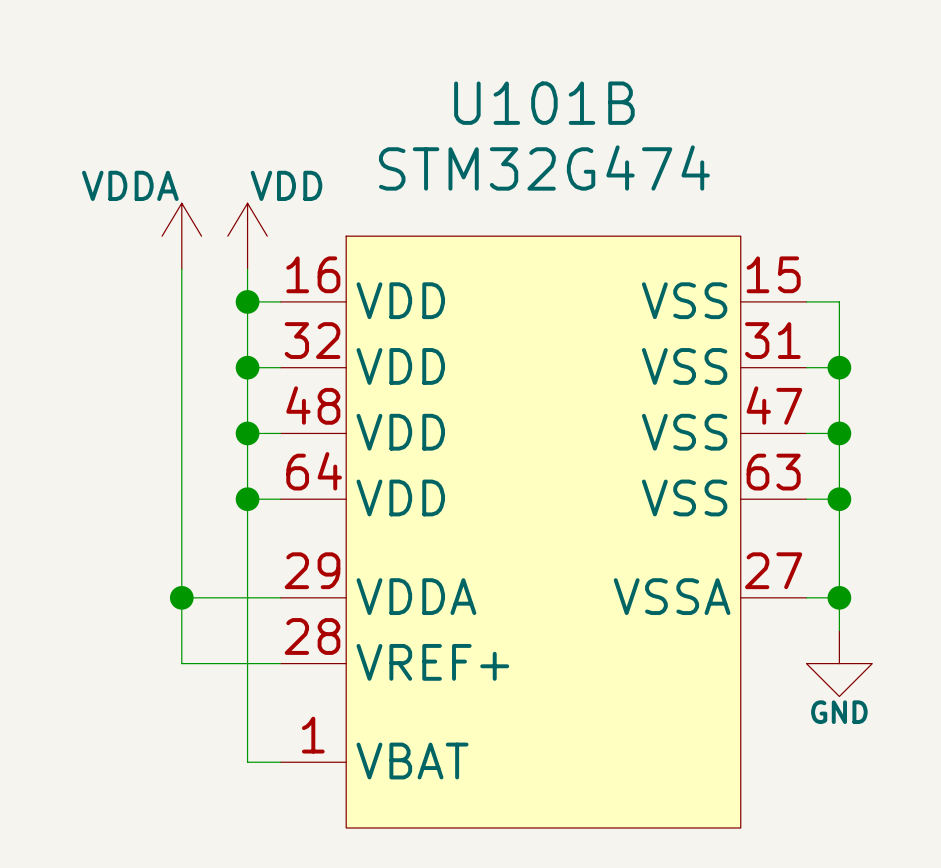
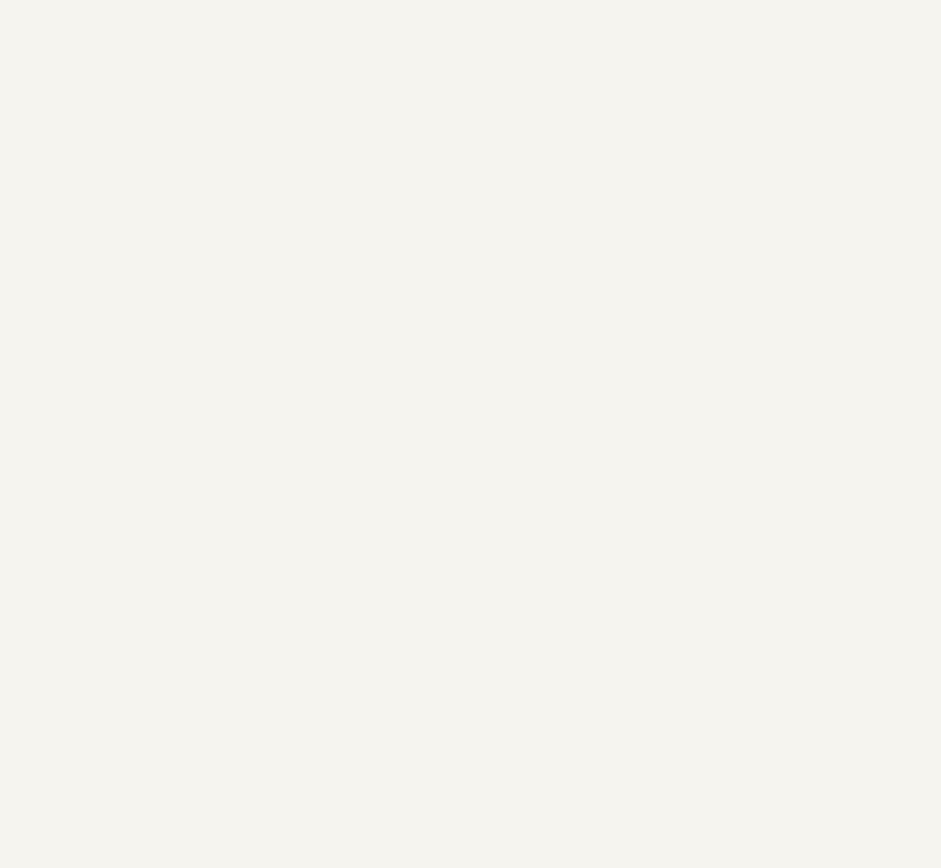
power symbol: VDDA (181, 236) -> none
power symbol: VDD (247, 236) -> none
wire: (181, 269) (181, 663) (280, 663) -> none
wire: (247, 269) (247, 762) (280, 762) -> none
wire: (247, 301) (280, 301) -> none
junction: (247, 301) -> none
wire: (806, 301) (839, 301) (839, 630) -> none
wire: (247, 367) (280, 367) -> none
junction: (247, 367) -> none
wire: (806, 367) (839, 367) -> none
junction: (839, 367) -> none
wire: (247, 433) (280, 433) -> none
junction: (247, 433) -> none
wire: (806, 433) (839, 433) -> none
junction: (839, 433) -> none
wire: (247, 499) (280, 499) -> none
junction: (247, 499) -> none
wire: (806, 499) (839, 499) -> none
junction: (839, 499) -> none
U101B: STM32G474 (543, 532) -> none
wire: (181, 597) (280, 597) -> none
junction: (181, 597) -> none
wire: (806, 597) (839, 597) -> none
junction: (839, 597) -> none
power symbol: GND (839, 663) -> none

